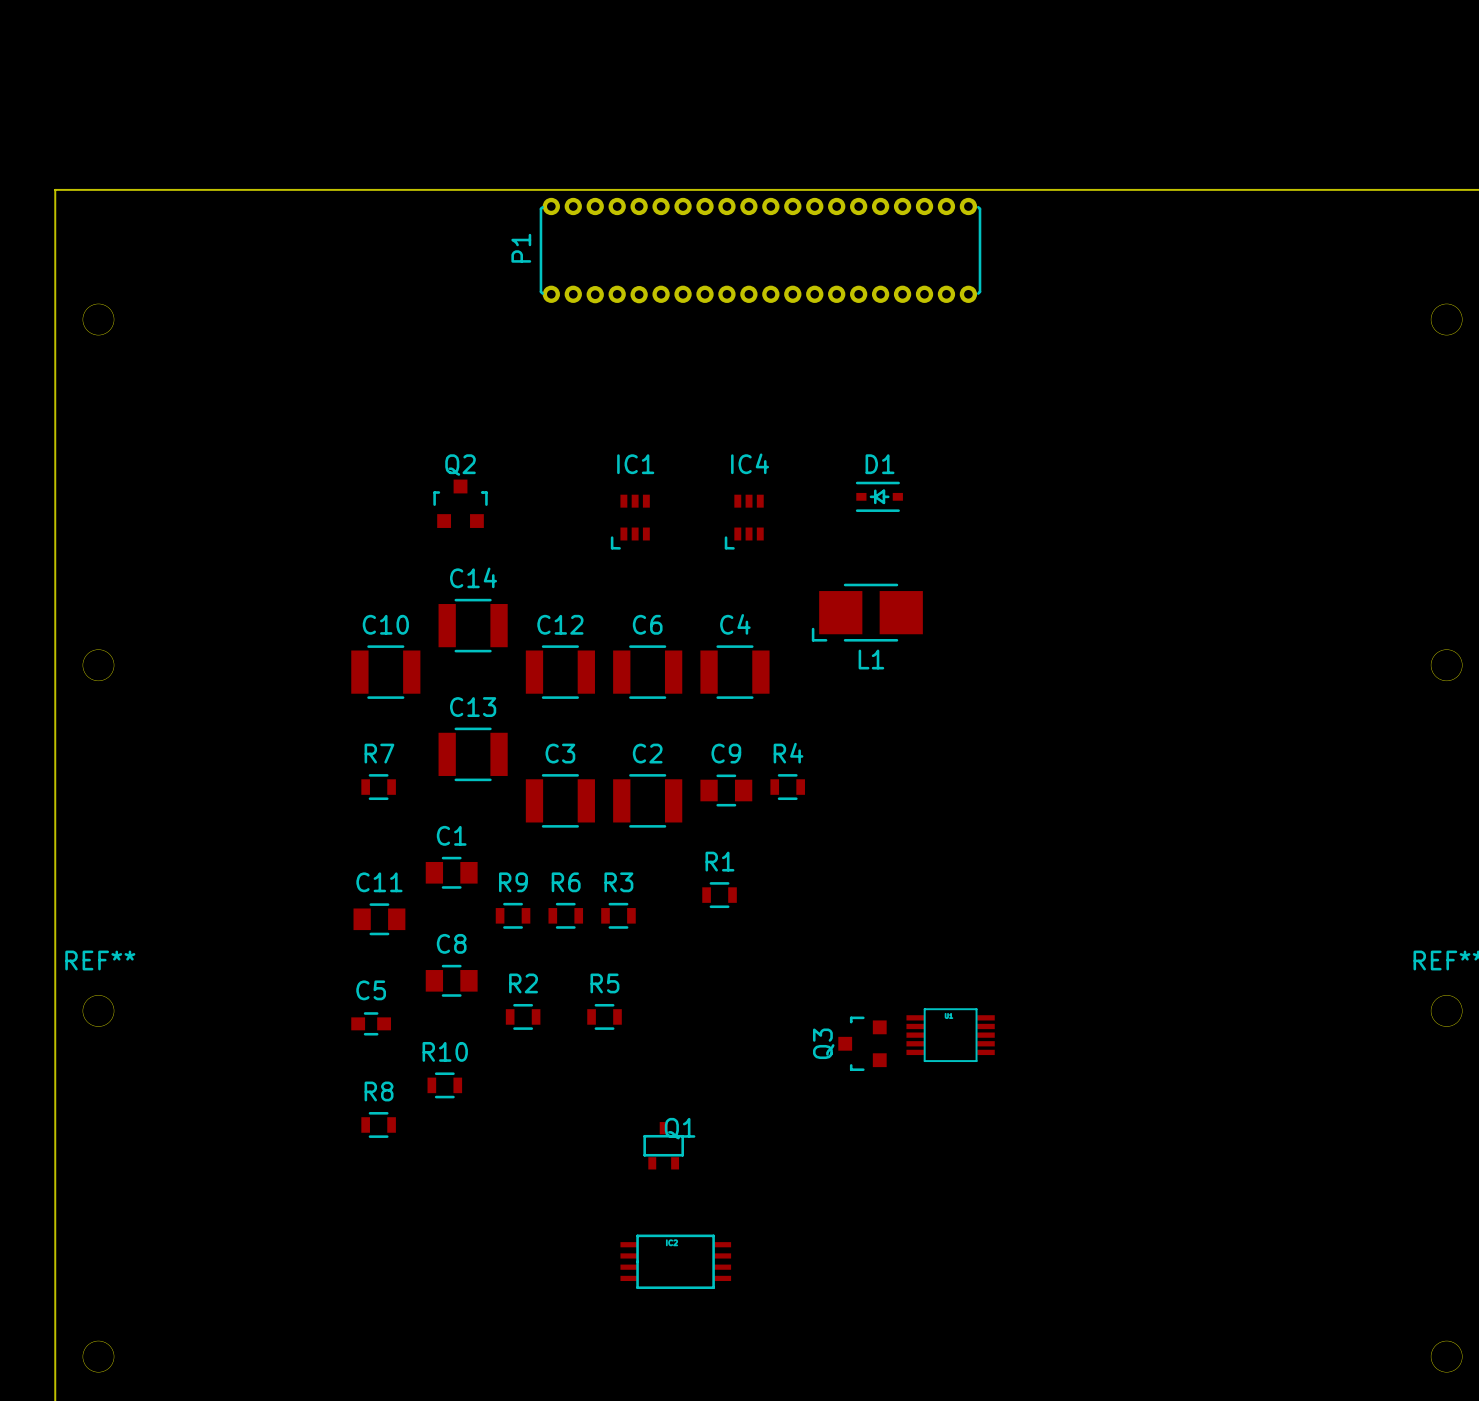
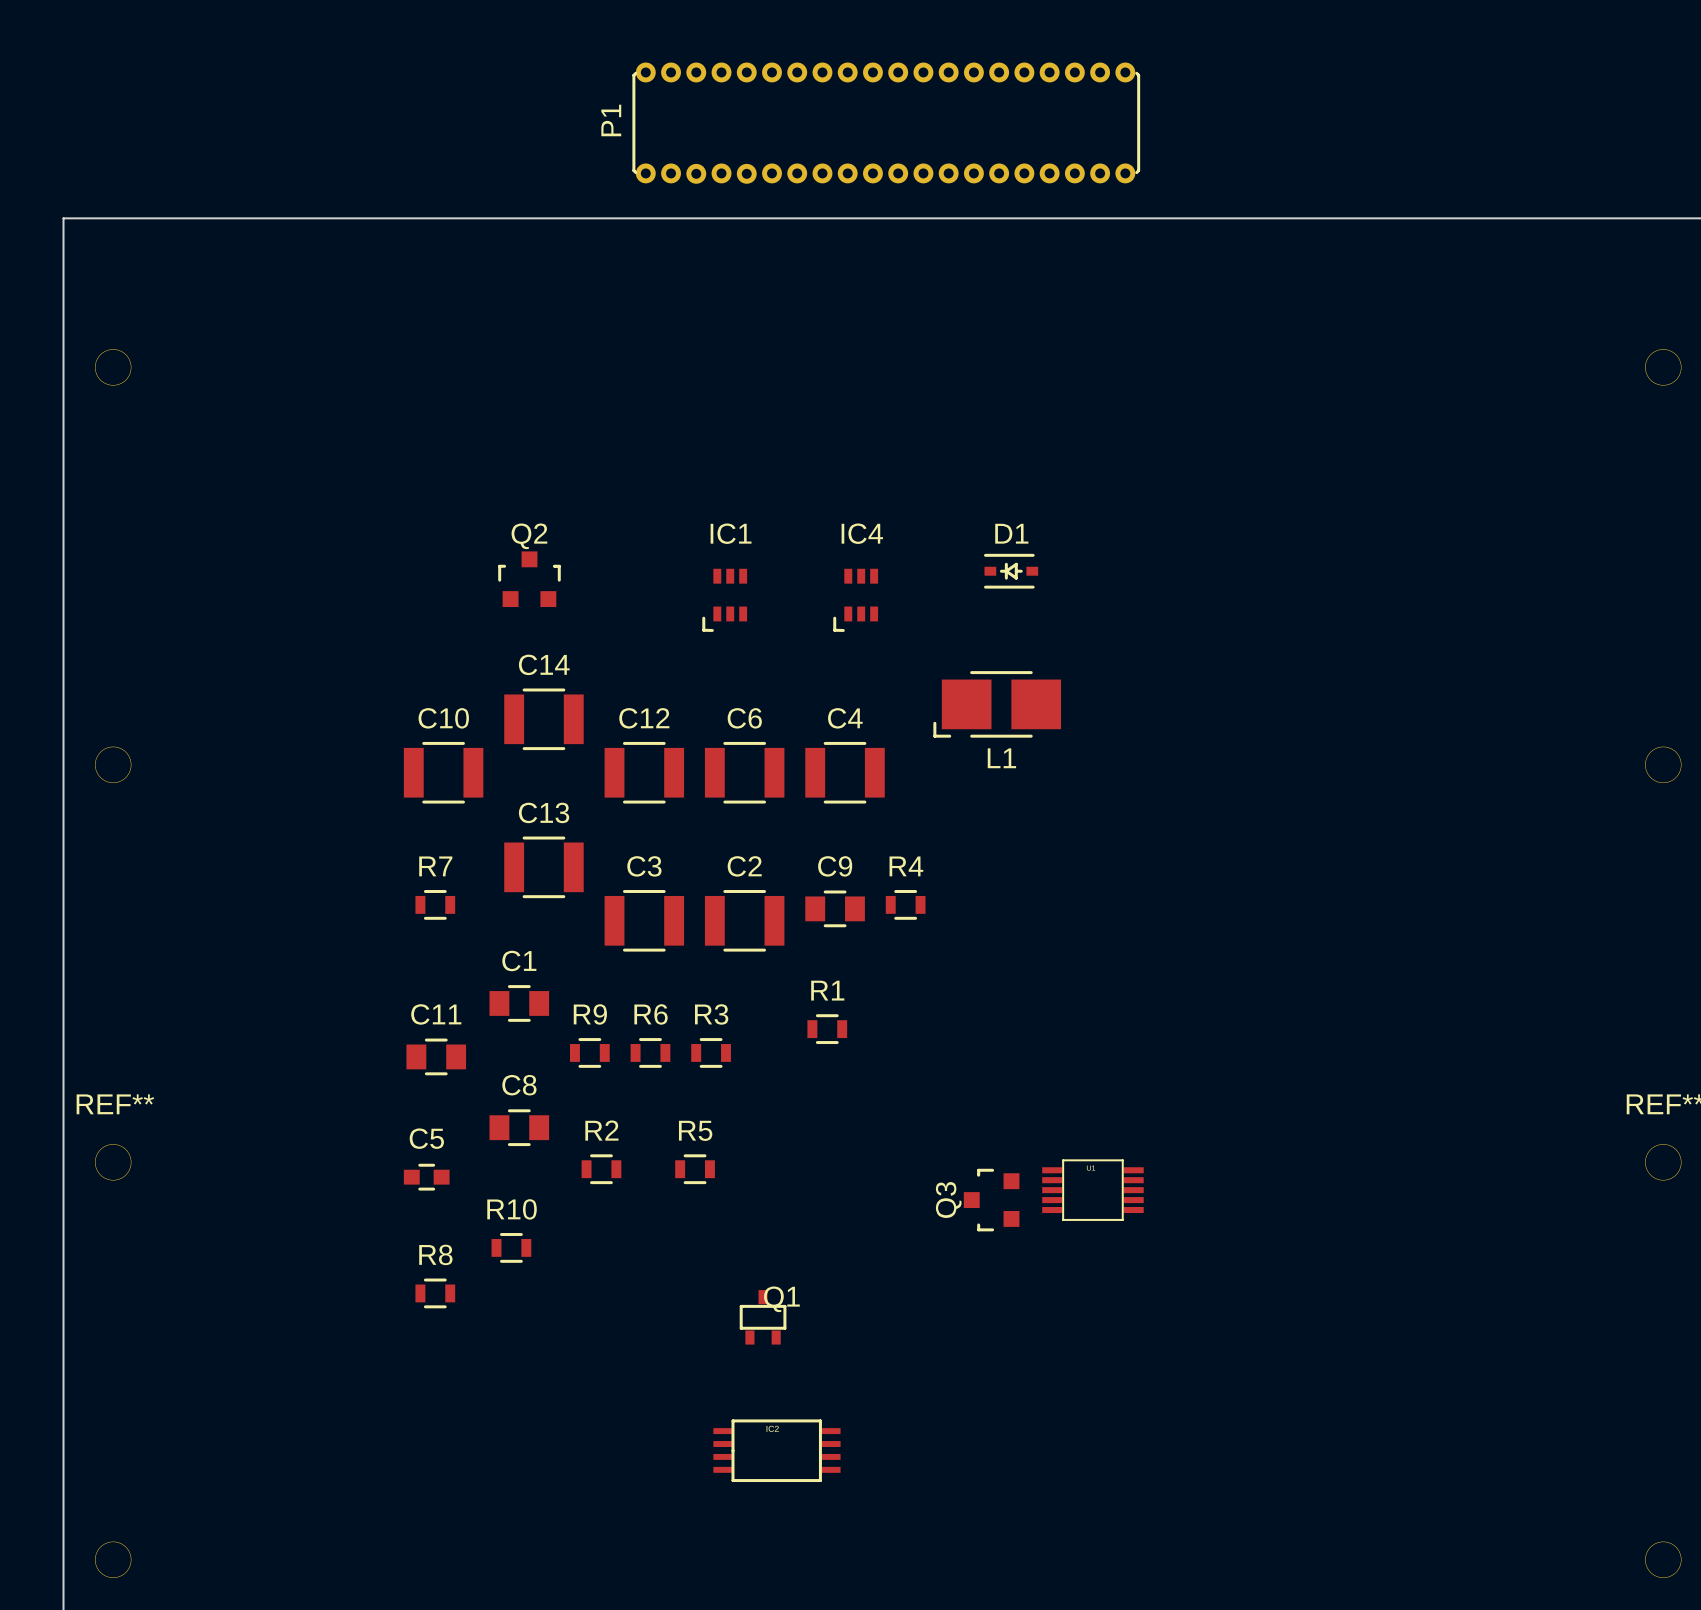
P1 position: (760, 250) -> (886, 123)

